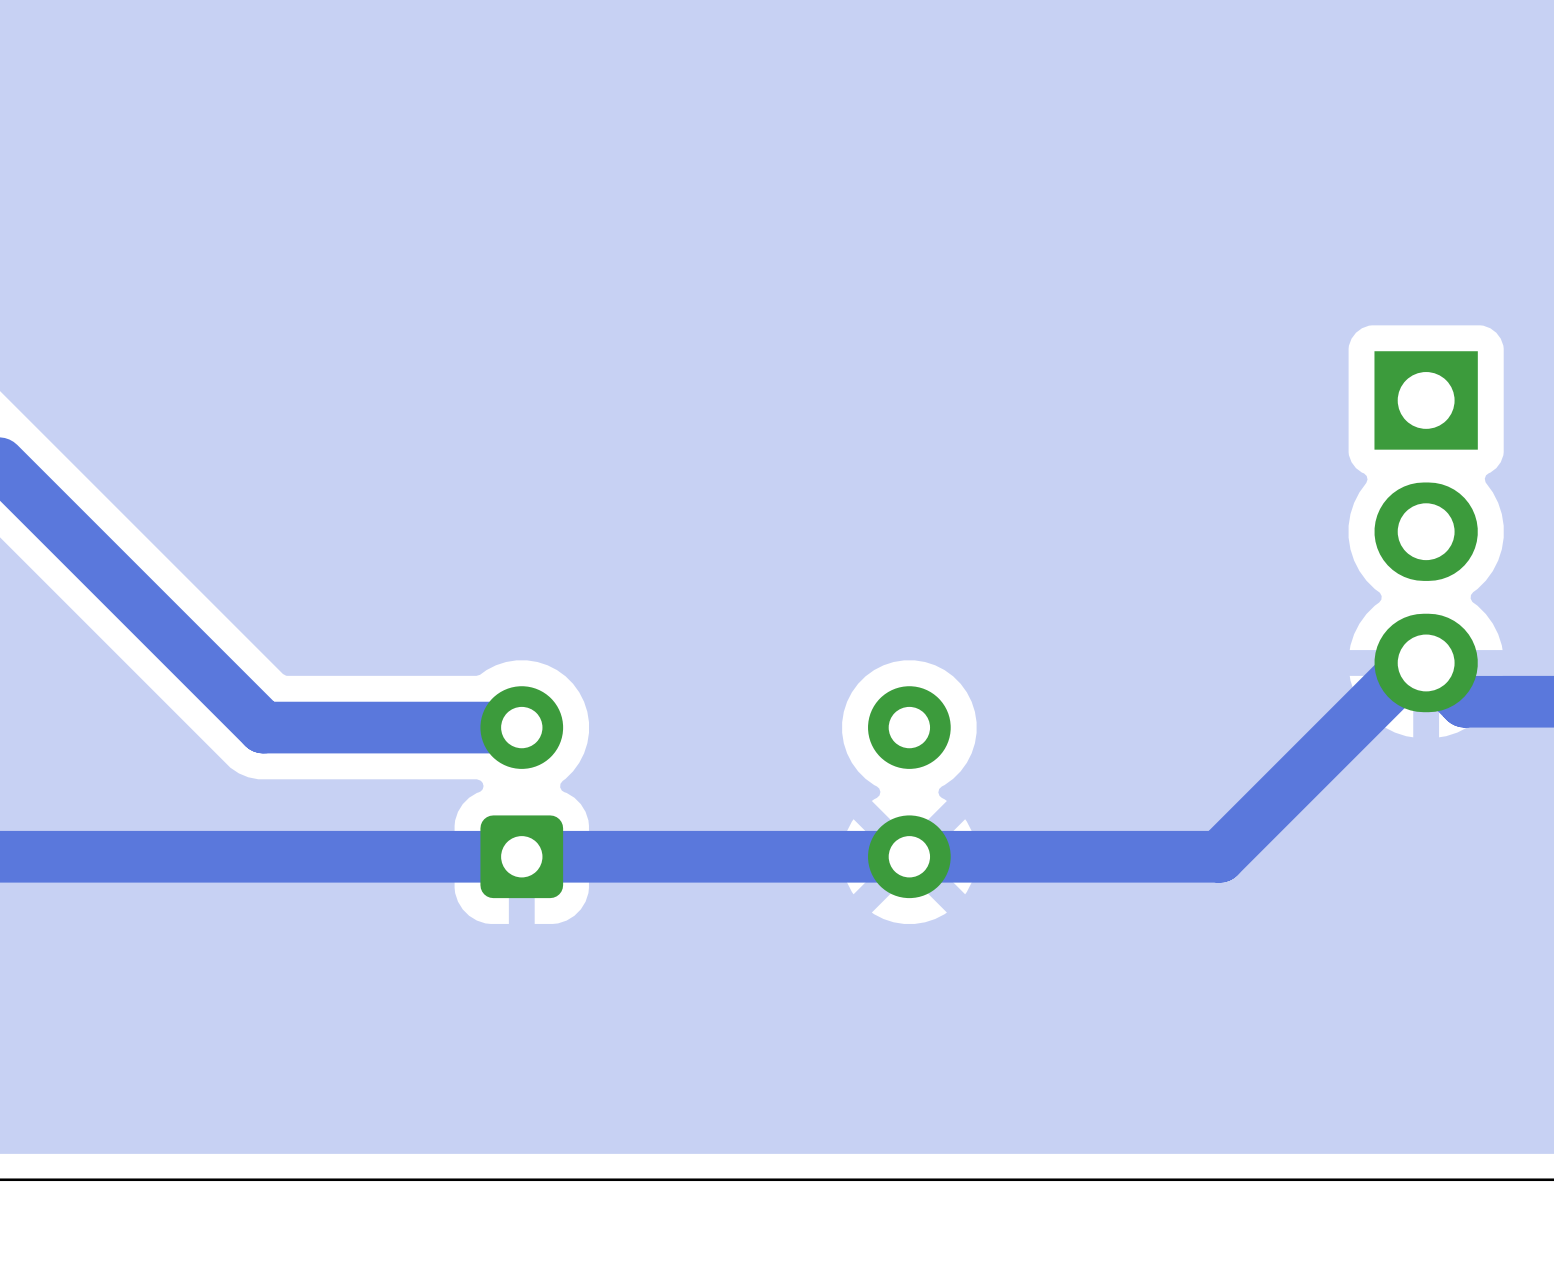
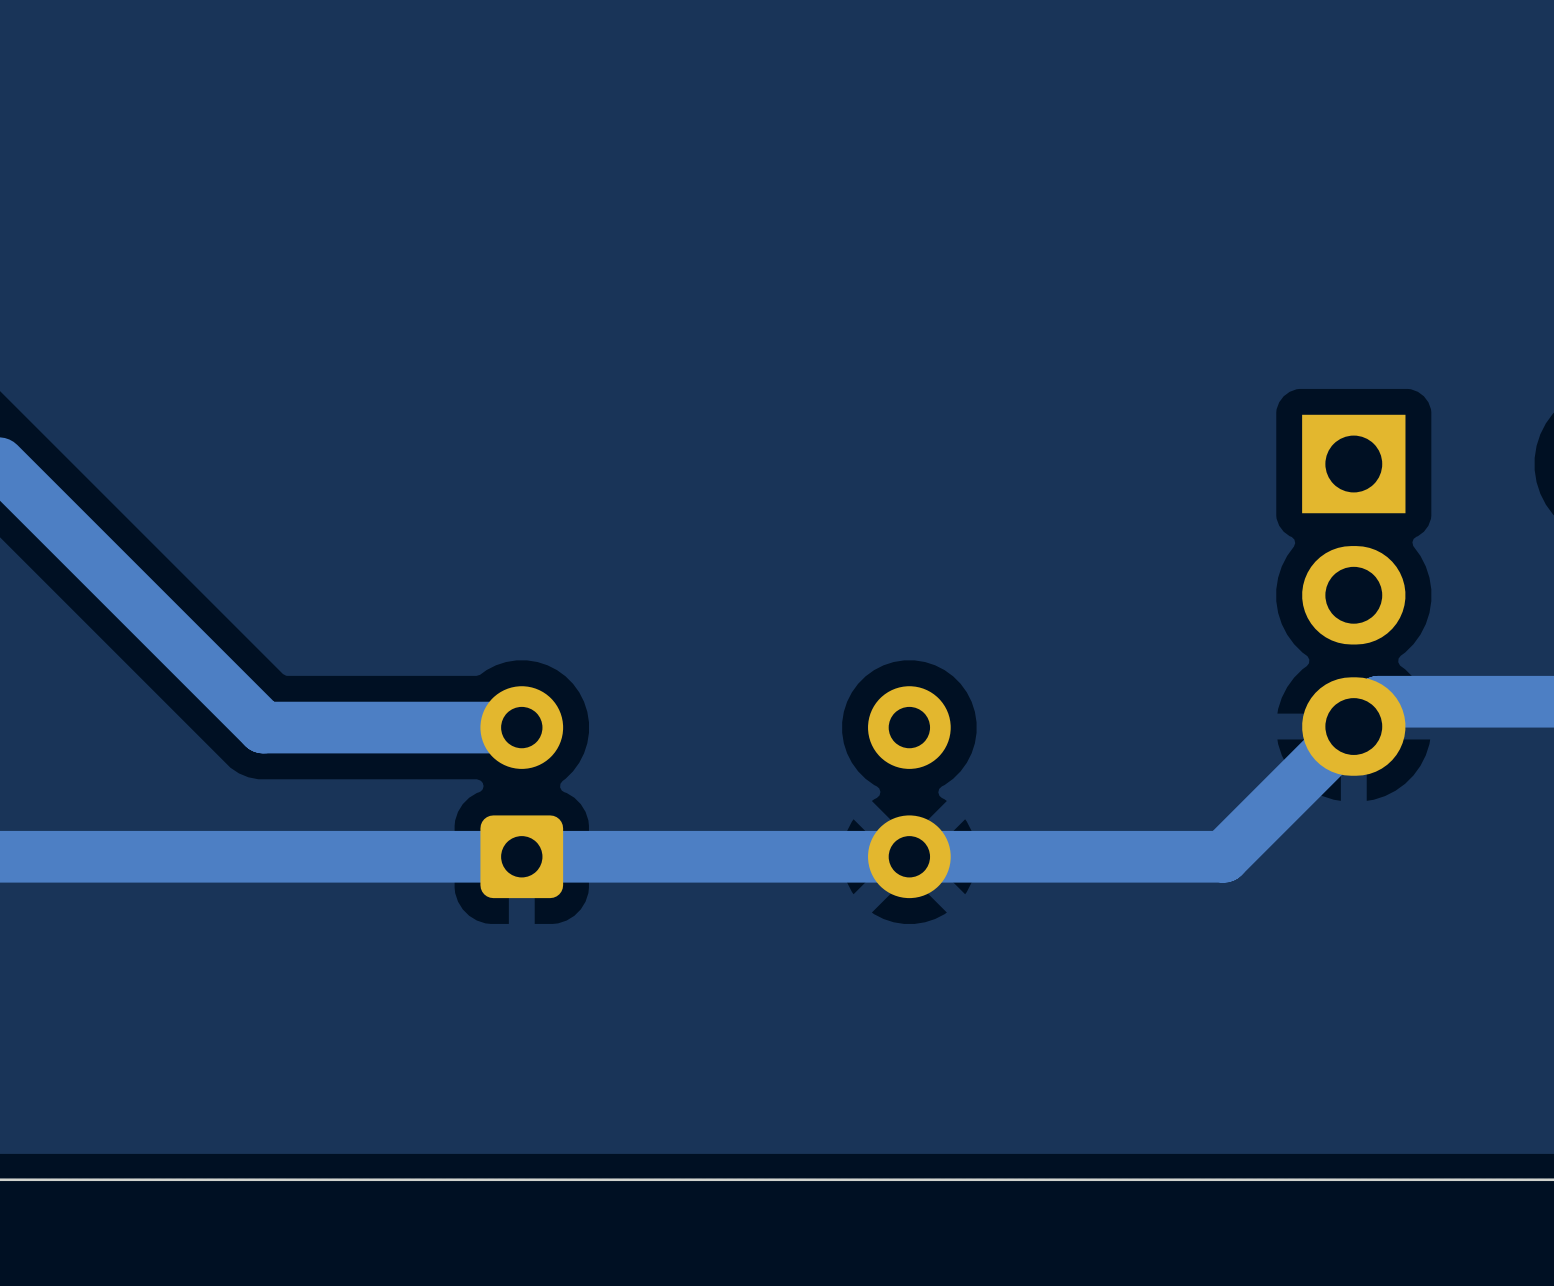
part position: (1426, 531) -> (1353, 595)
track: (1464, 701) (1426, 662) (1413, 662) (1219, 856) -> (1464, 701) (1378, 701) (1223, 856) (1219, 856)

